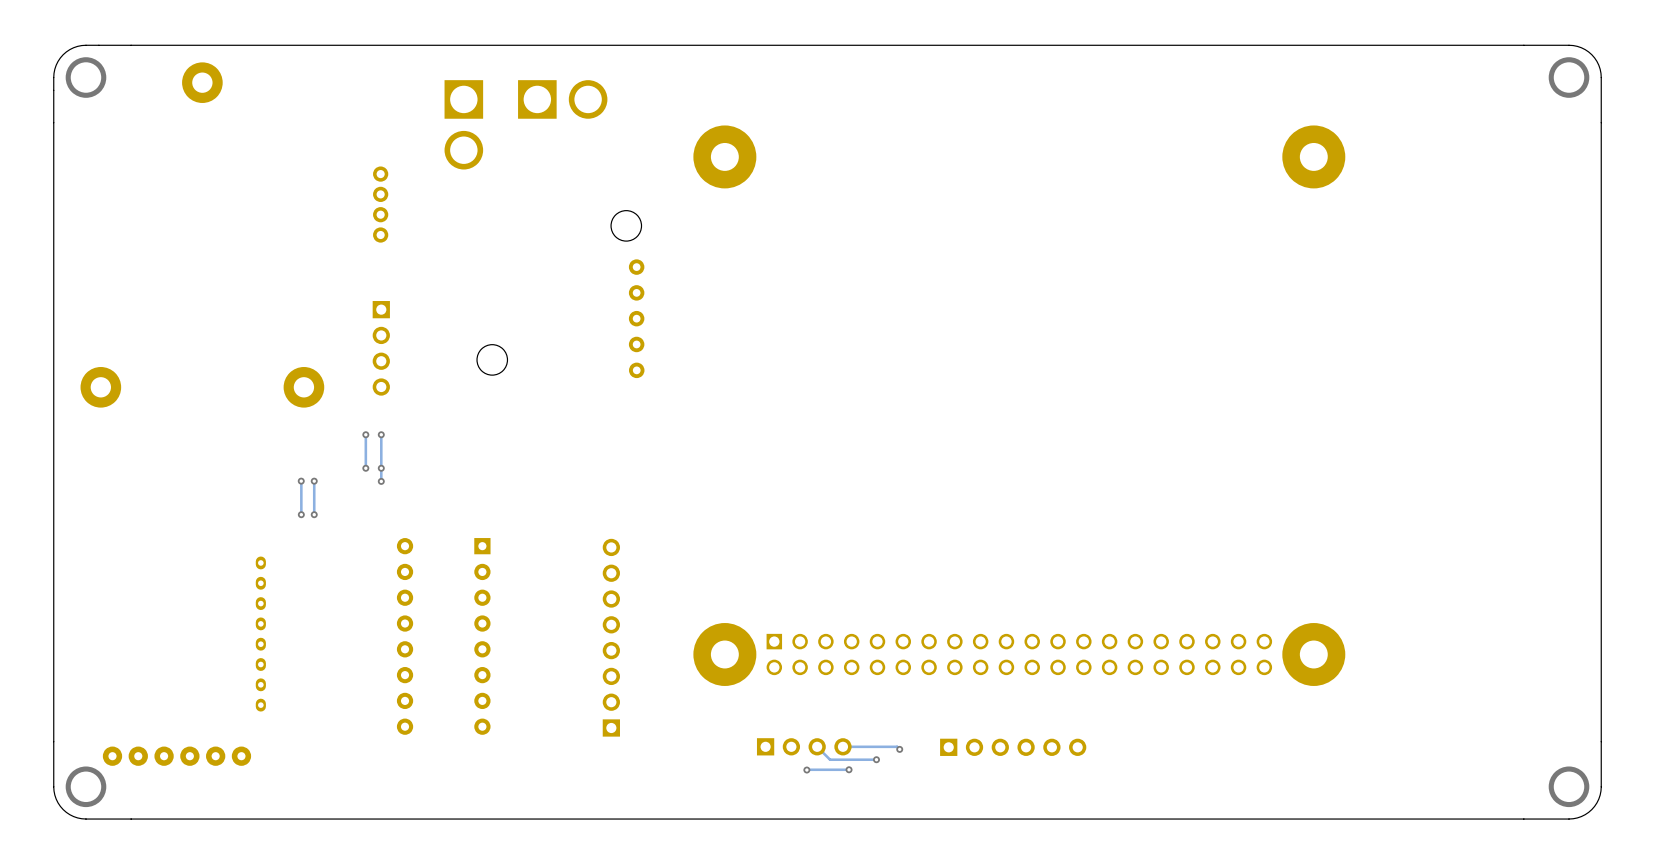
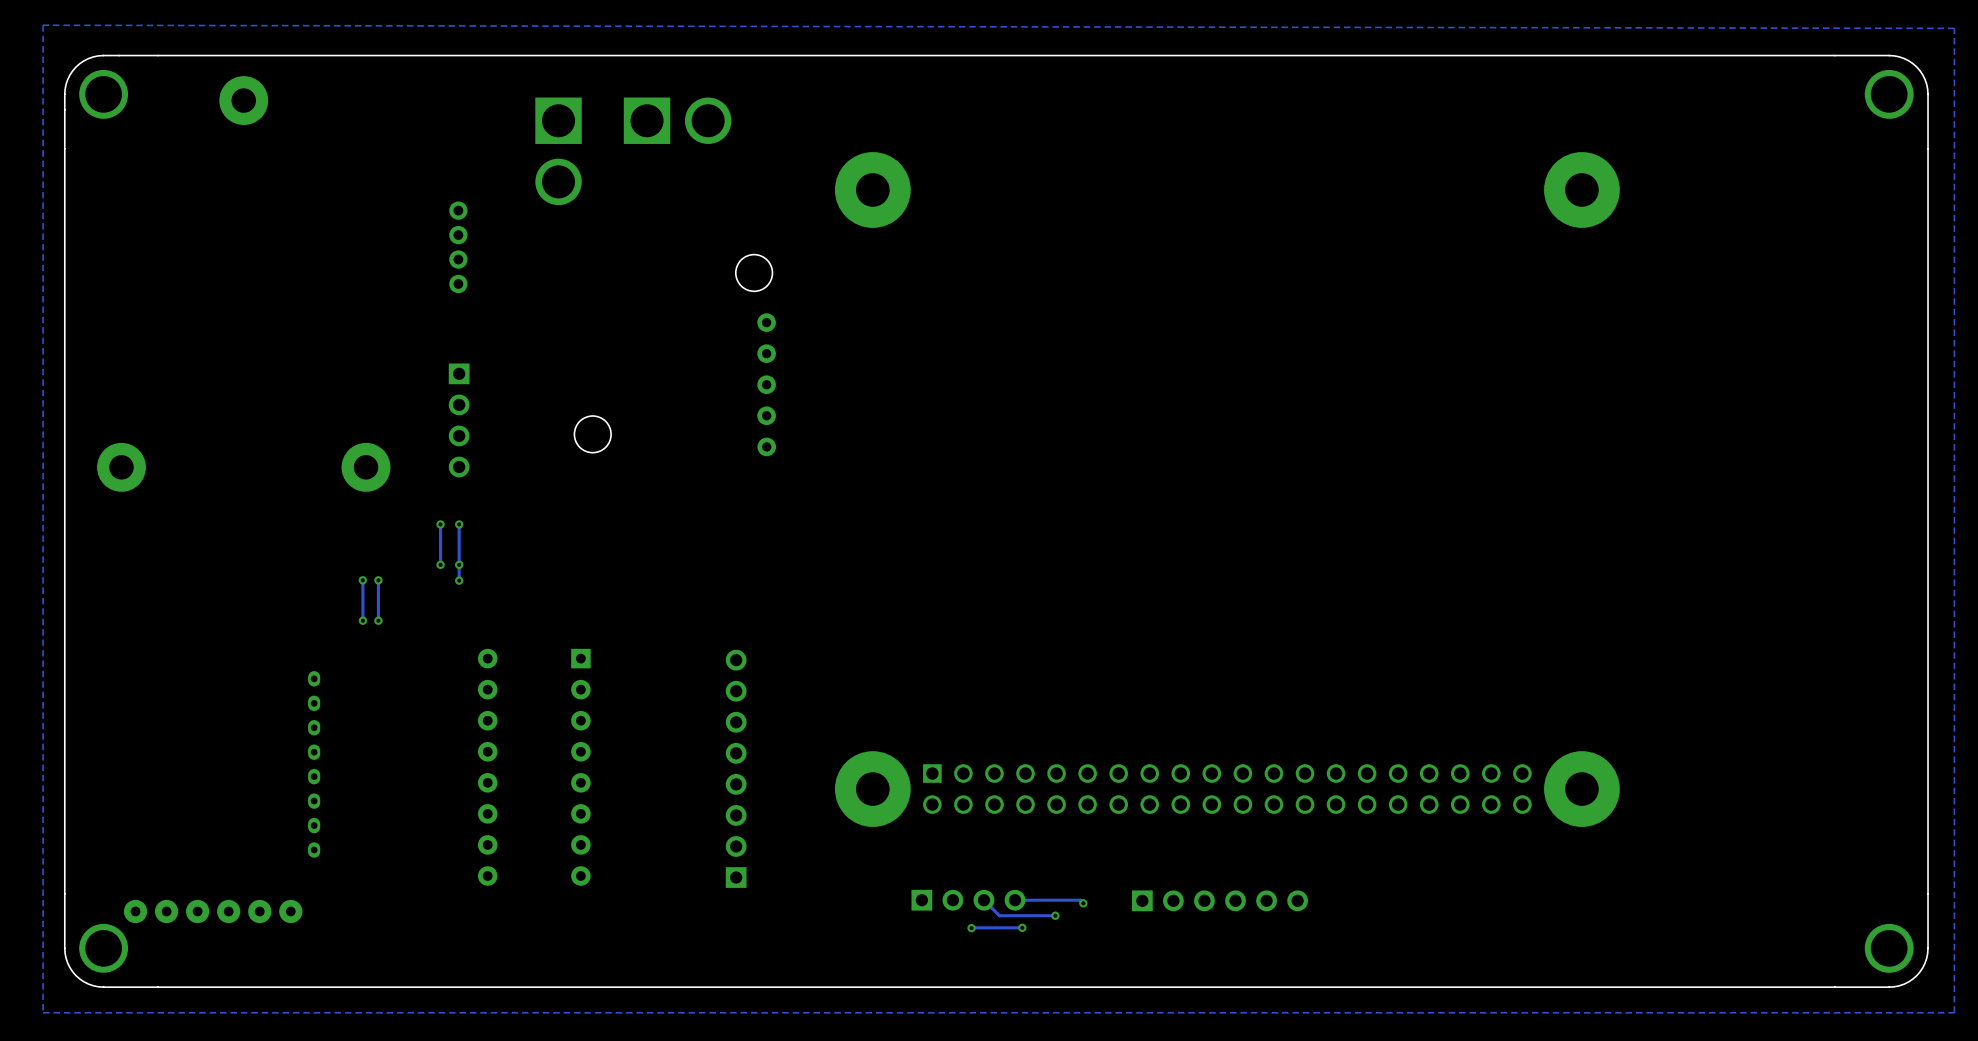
zone outline: none -> (43, 25) (1954, 28) (1954, 1012) (43, 1012) (43, 25)

